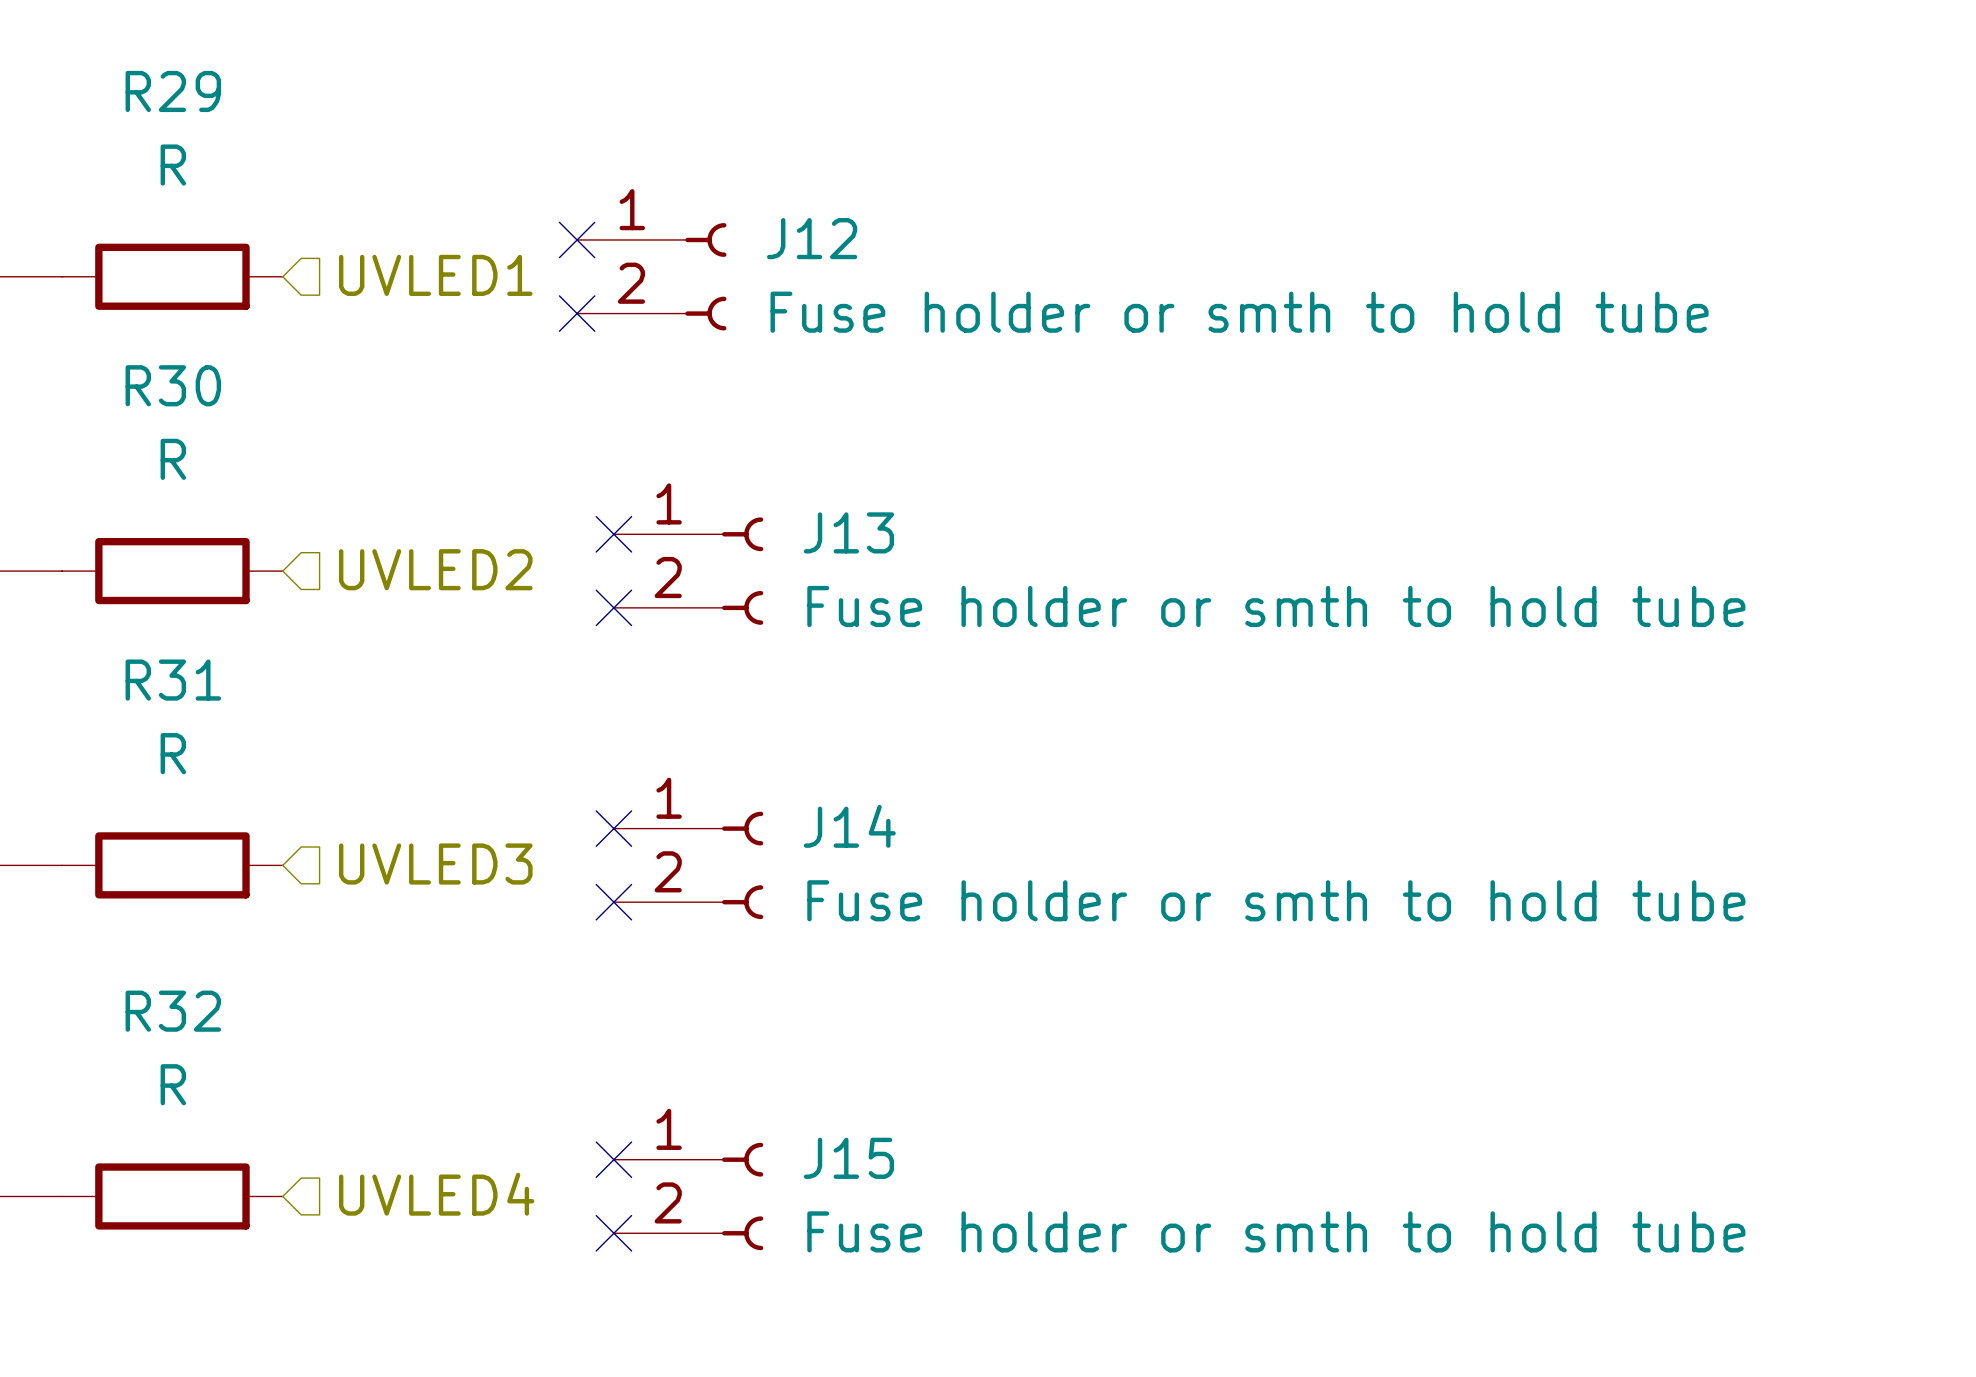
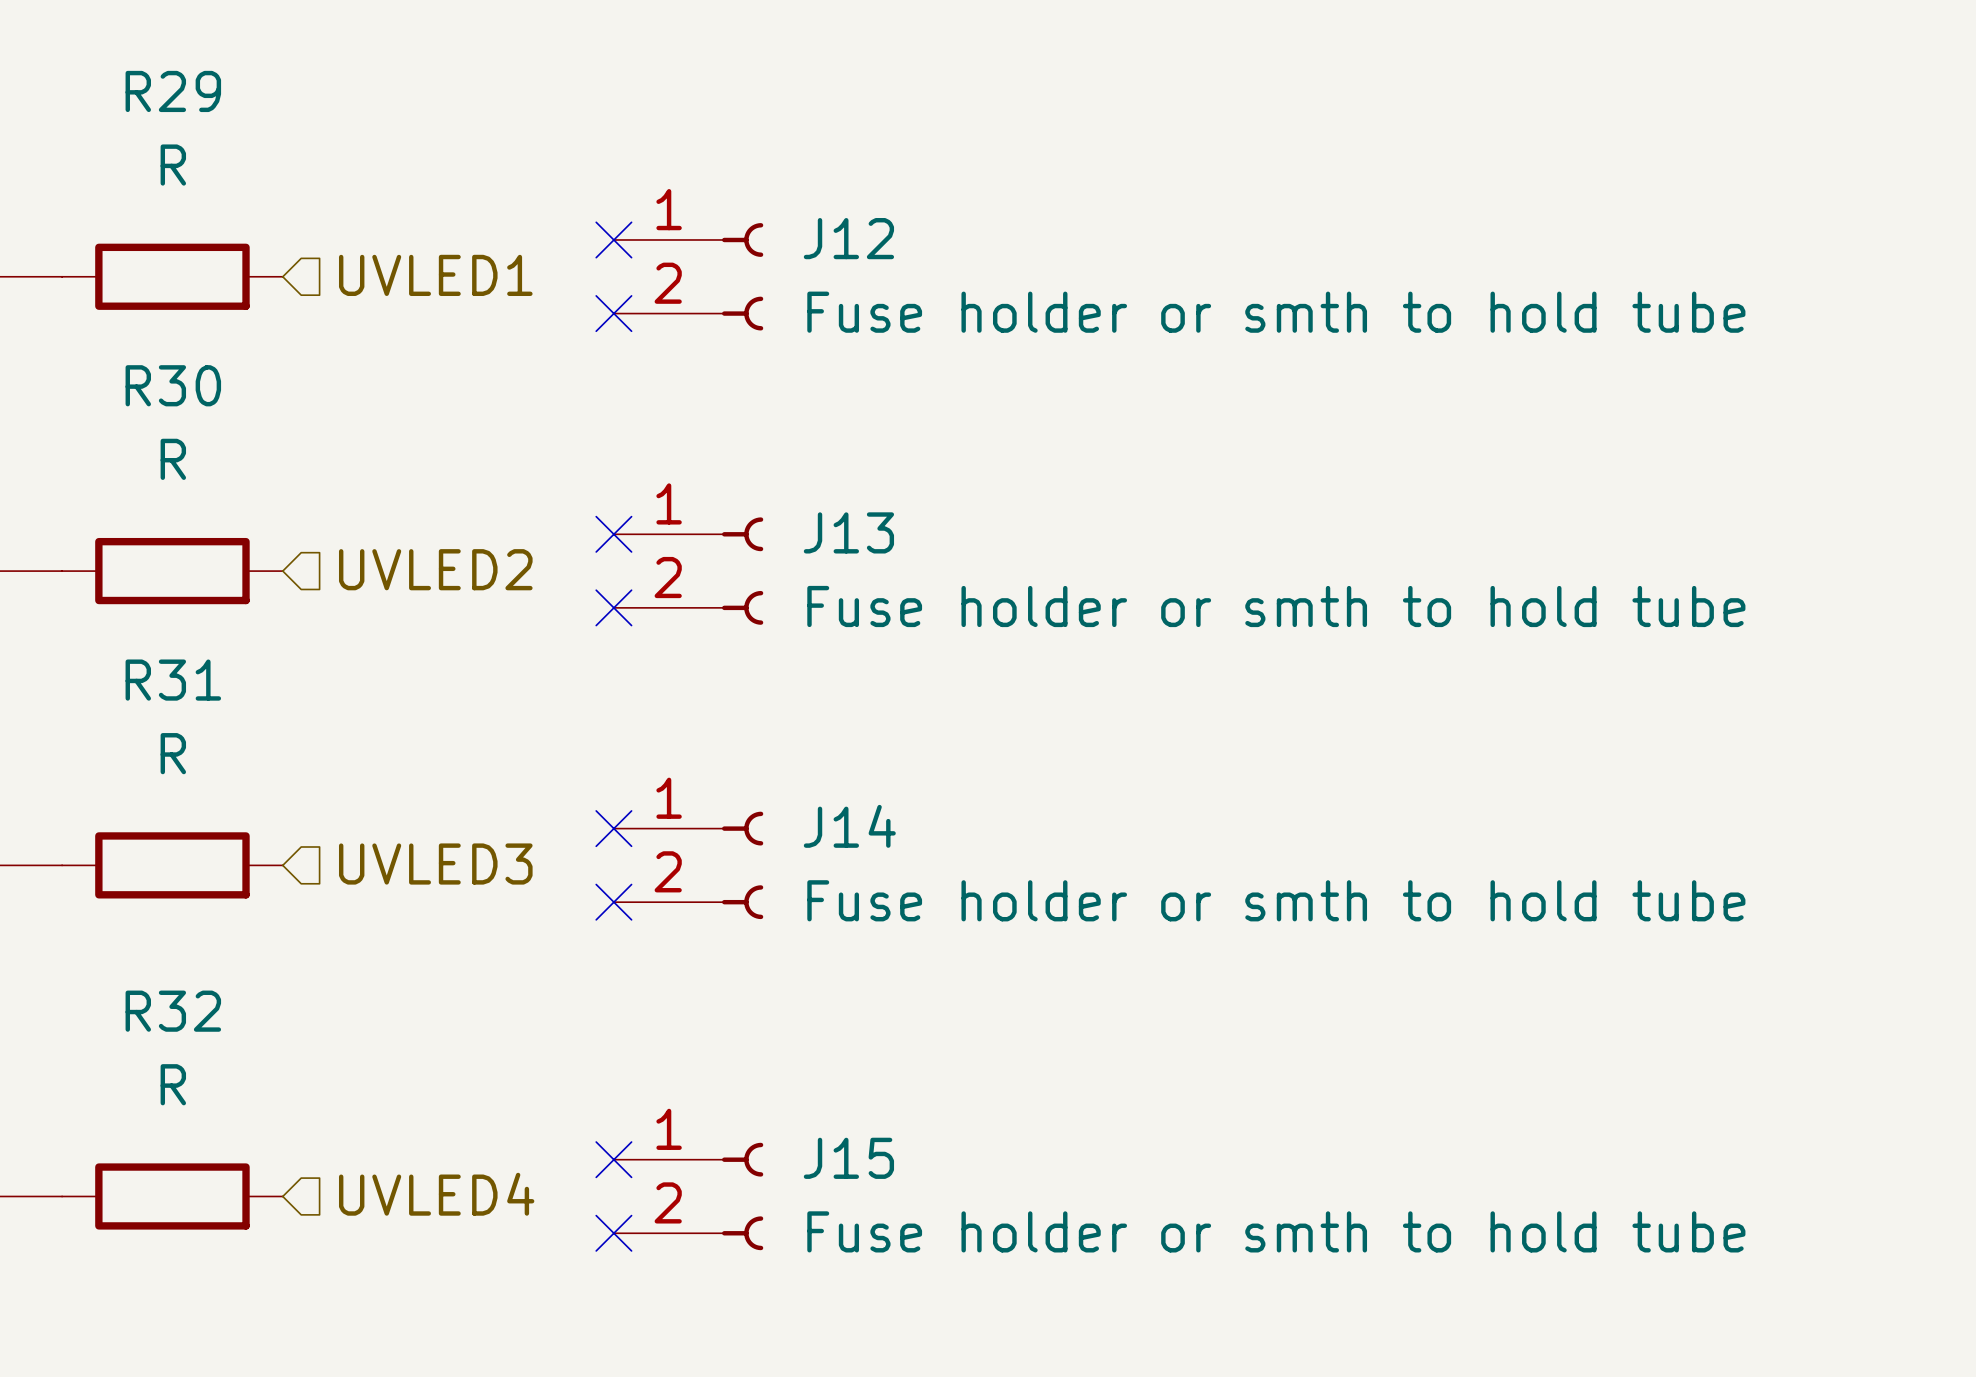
no-connect mark position: (577, 239) -> (613, 239)
J12 position: (651, 276) -> (688, 276)
no-connect mark position: (577, 313) -> (613, 313)

